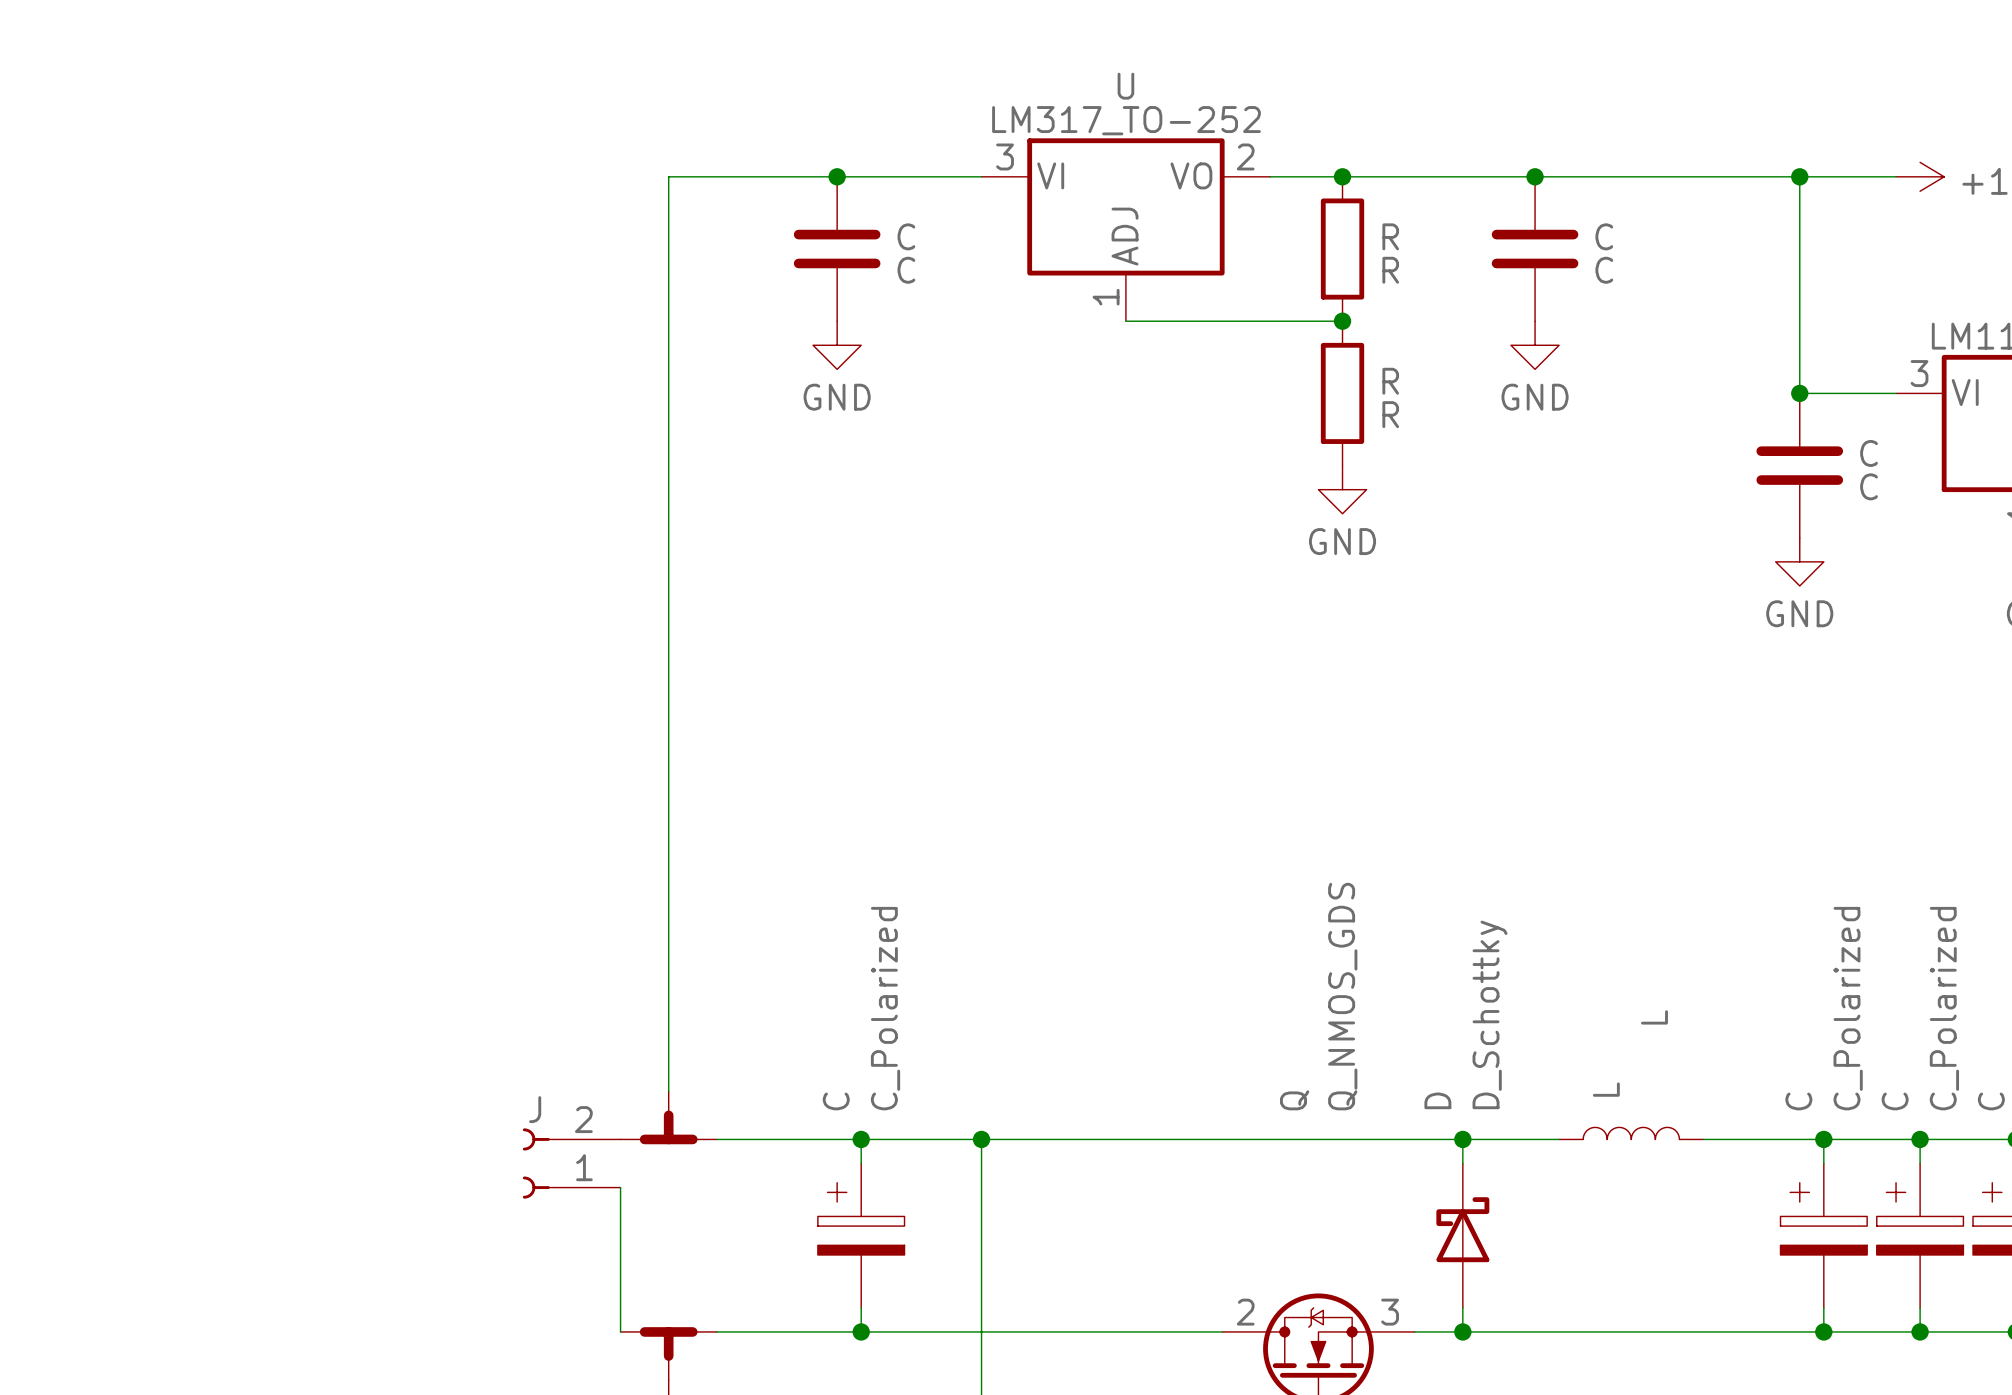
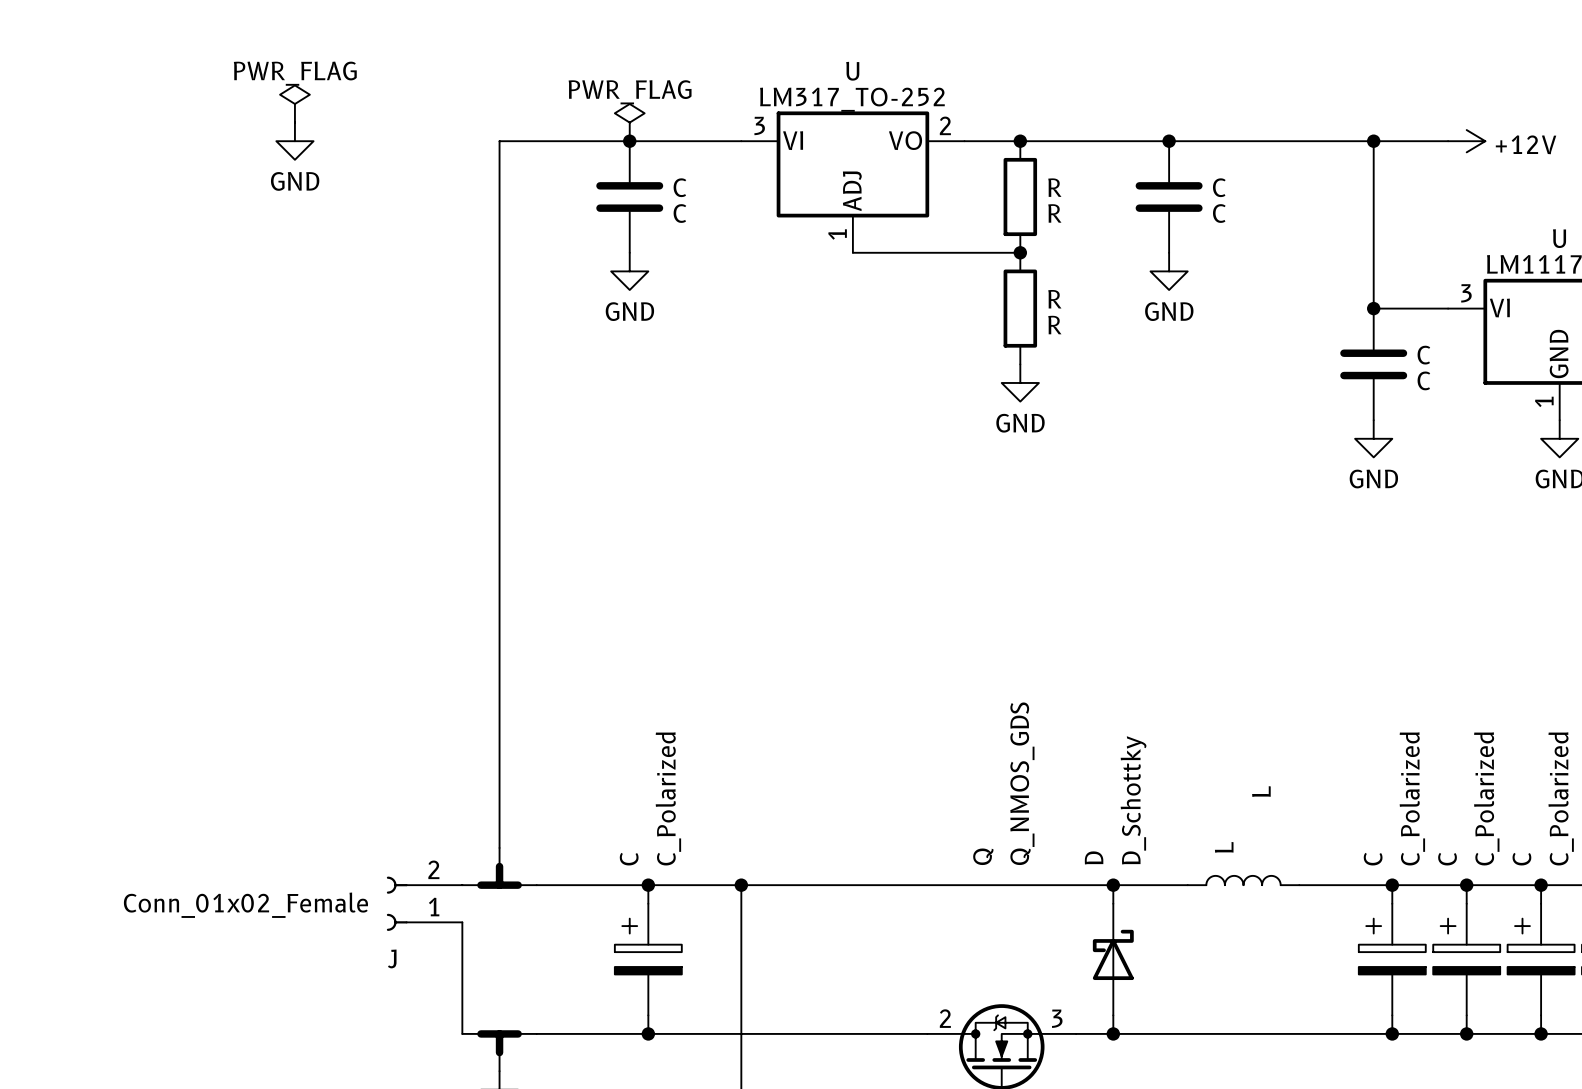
power symbol: none -> PWR_FLAG (294, 104)
power symbol: none -> PWR_FLAG (629, 122)
power symbol: none -> GND (294, 141)
J name position: J (535, 1109) -> J (392, 958)
J value: none -> Conn_01x02_Female (245, 905)

